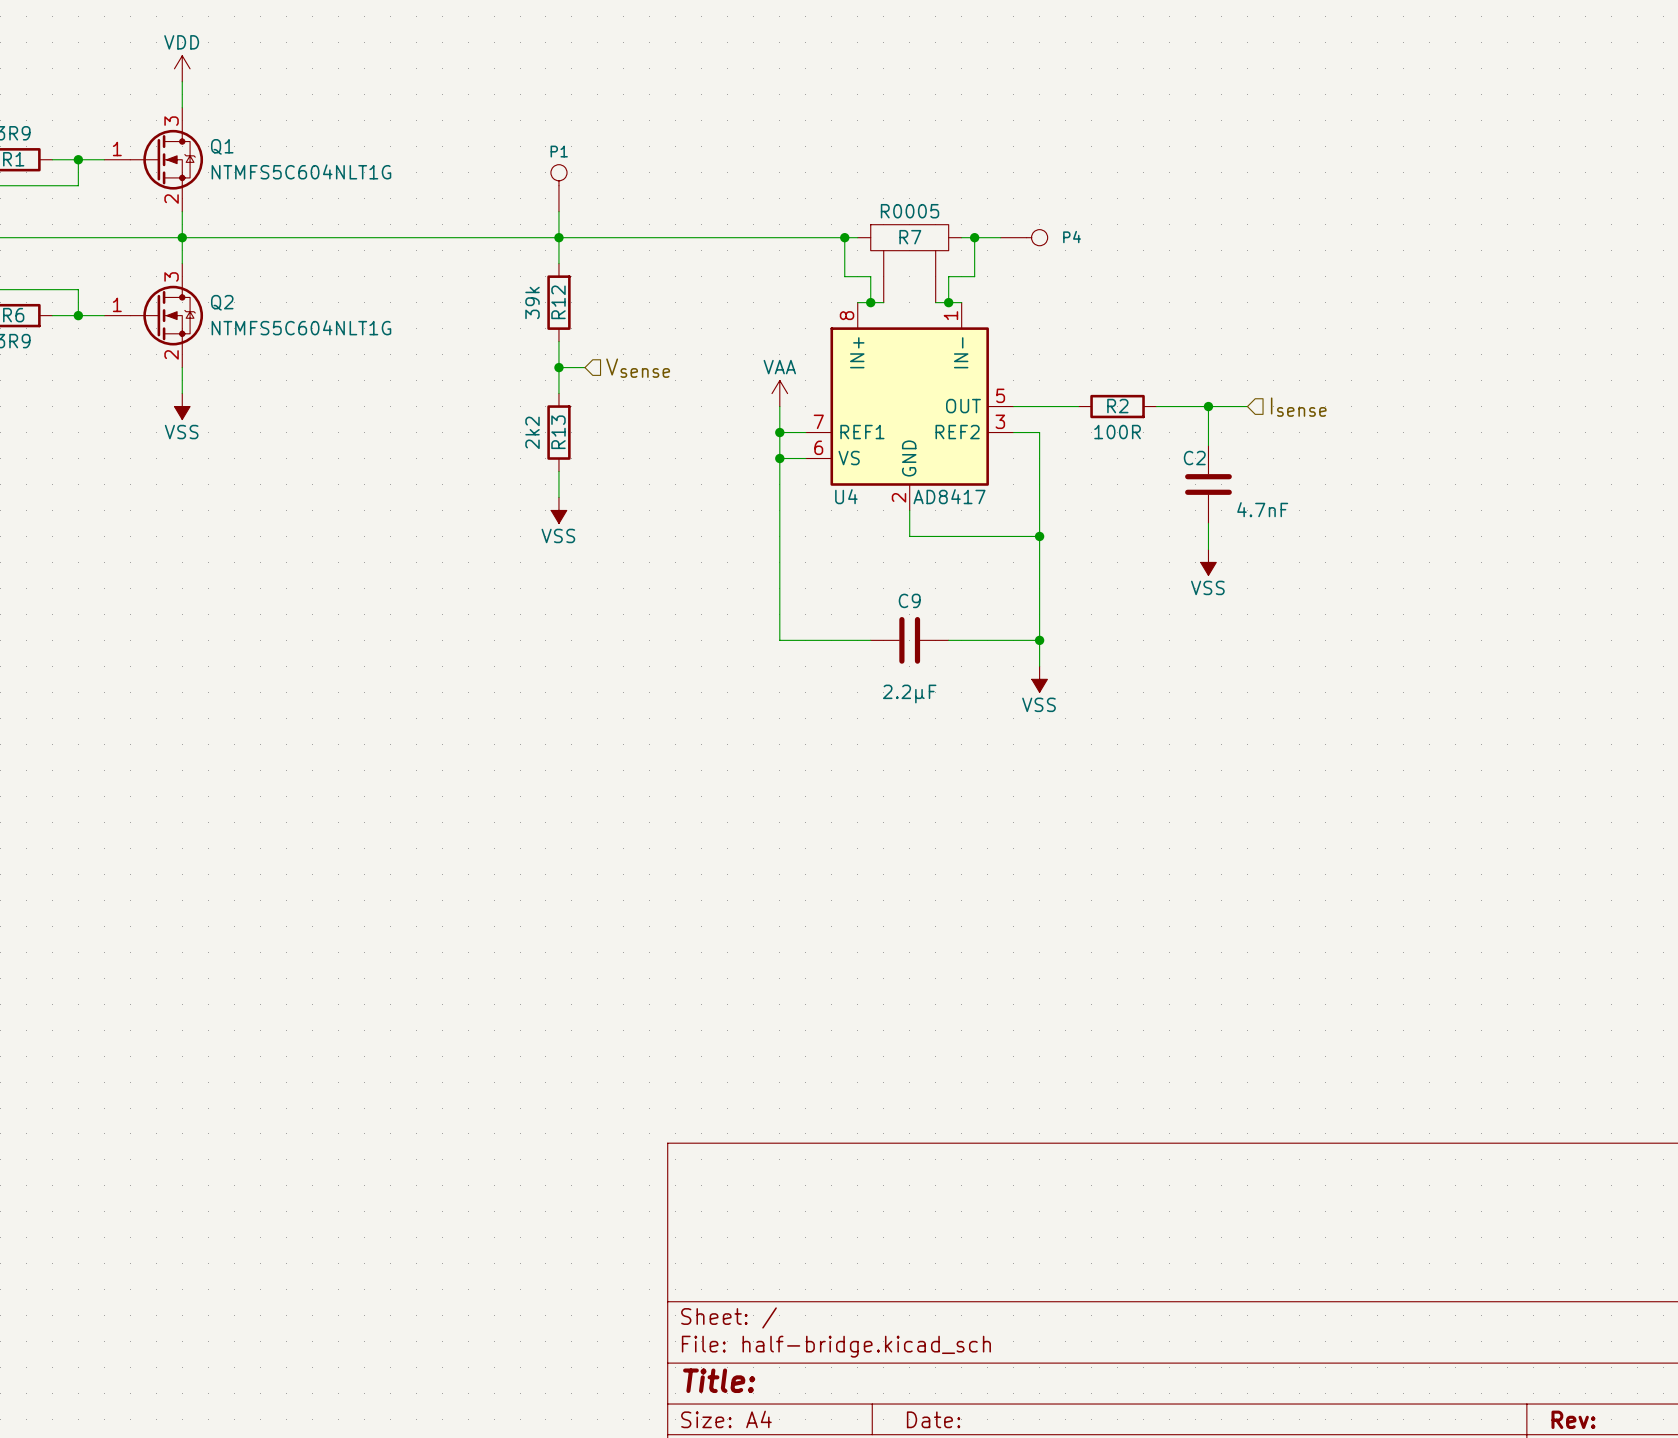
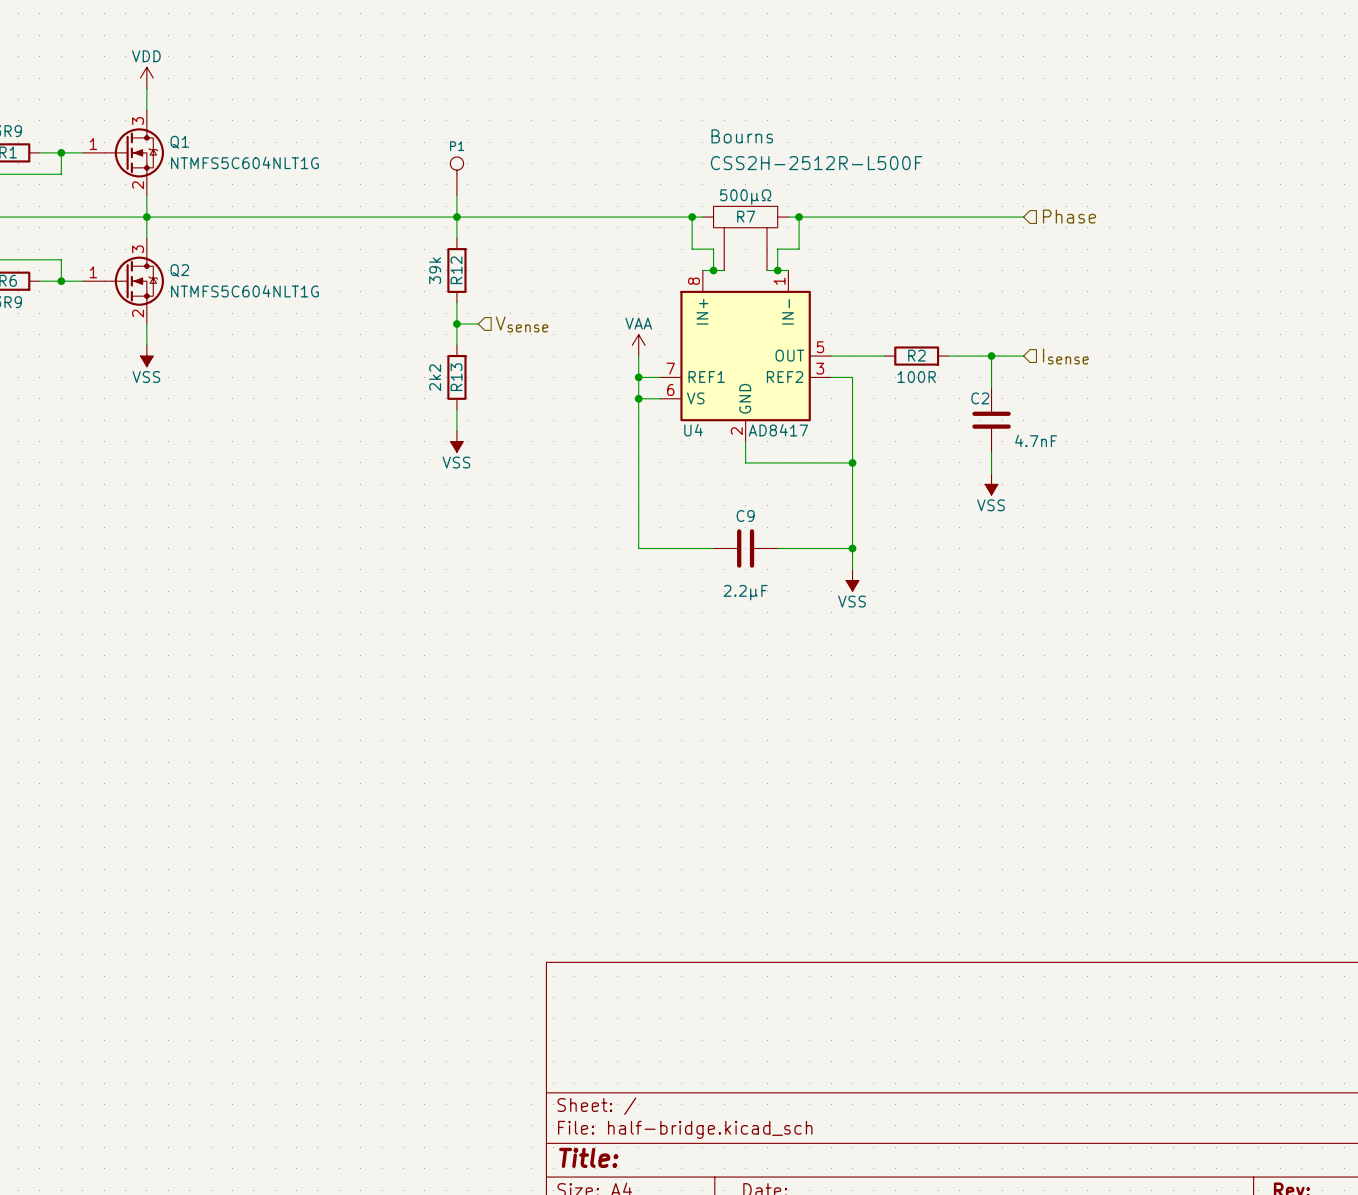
R7 text: none -> Bourns (742, 136)
R7 text: none -> CSS2H-2512R-L500F (816, 163)
R7 value: R0005 (910, 211) -> 500µΩ (745, 197)
wire: none -> (820, 217) (1023, 217)
P4: (1024, 237) -> none
hierarchical label: none -> Phase (1069, 216)

